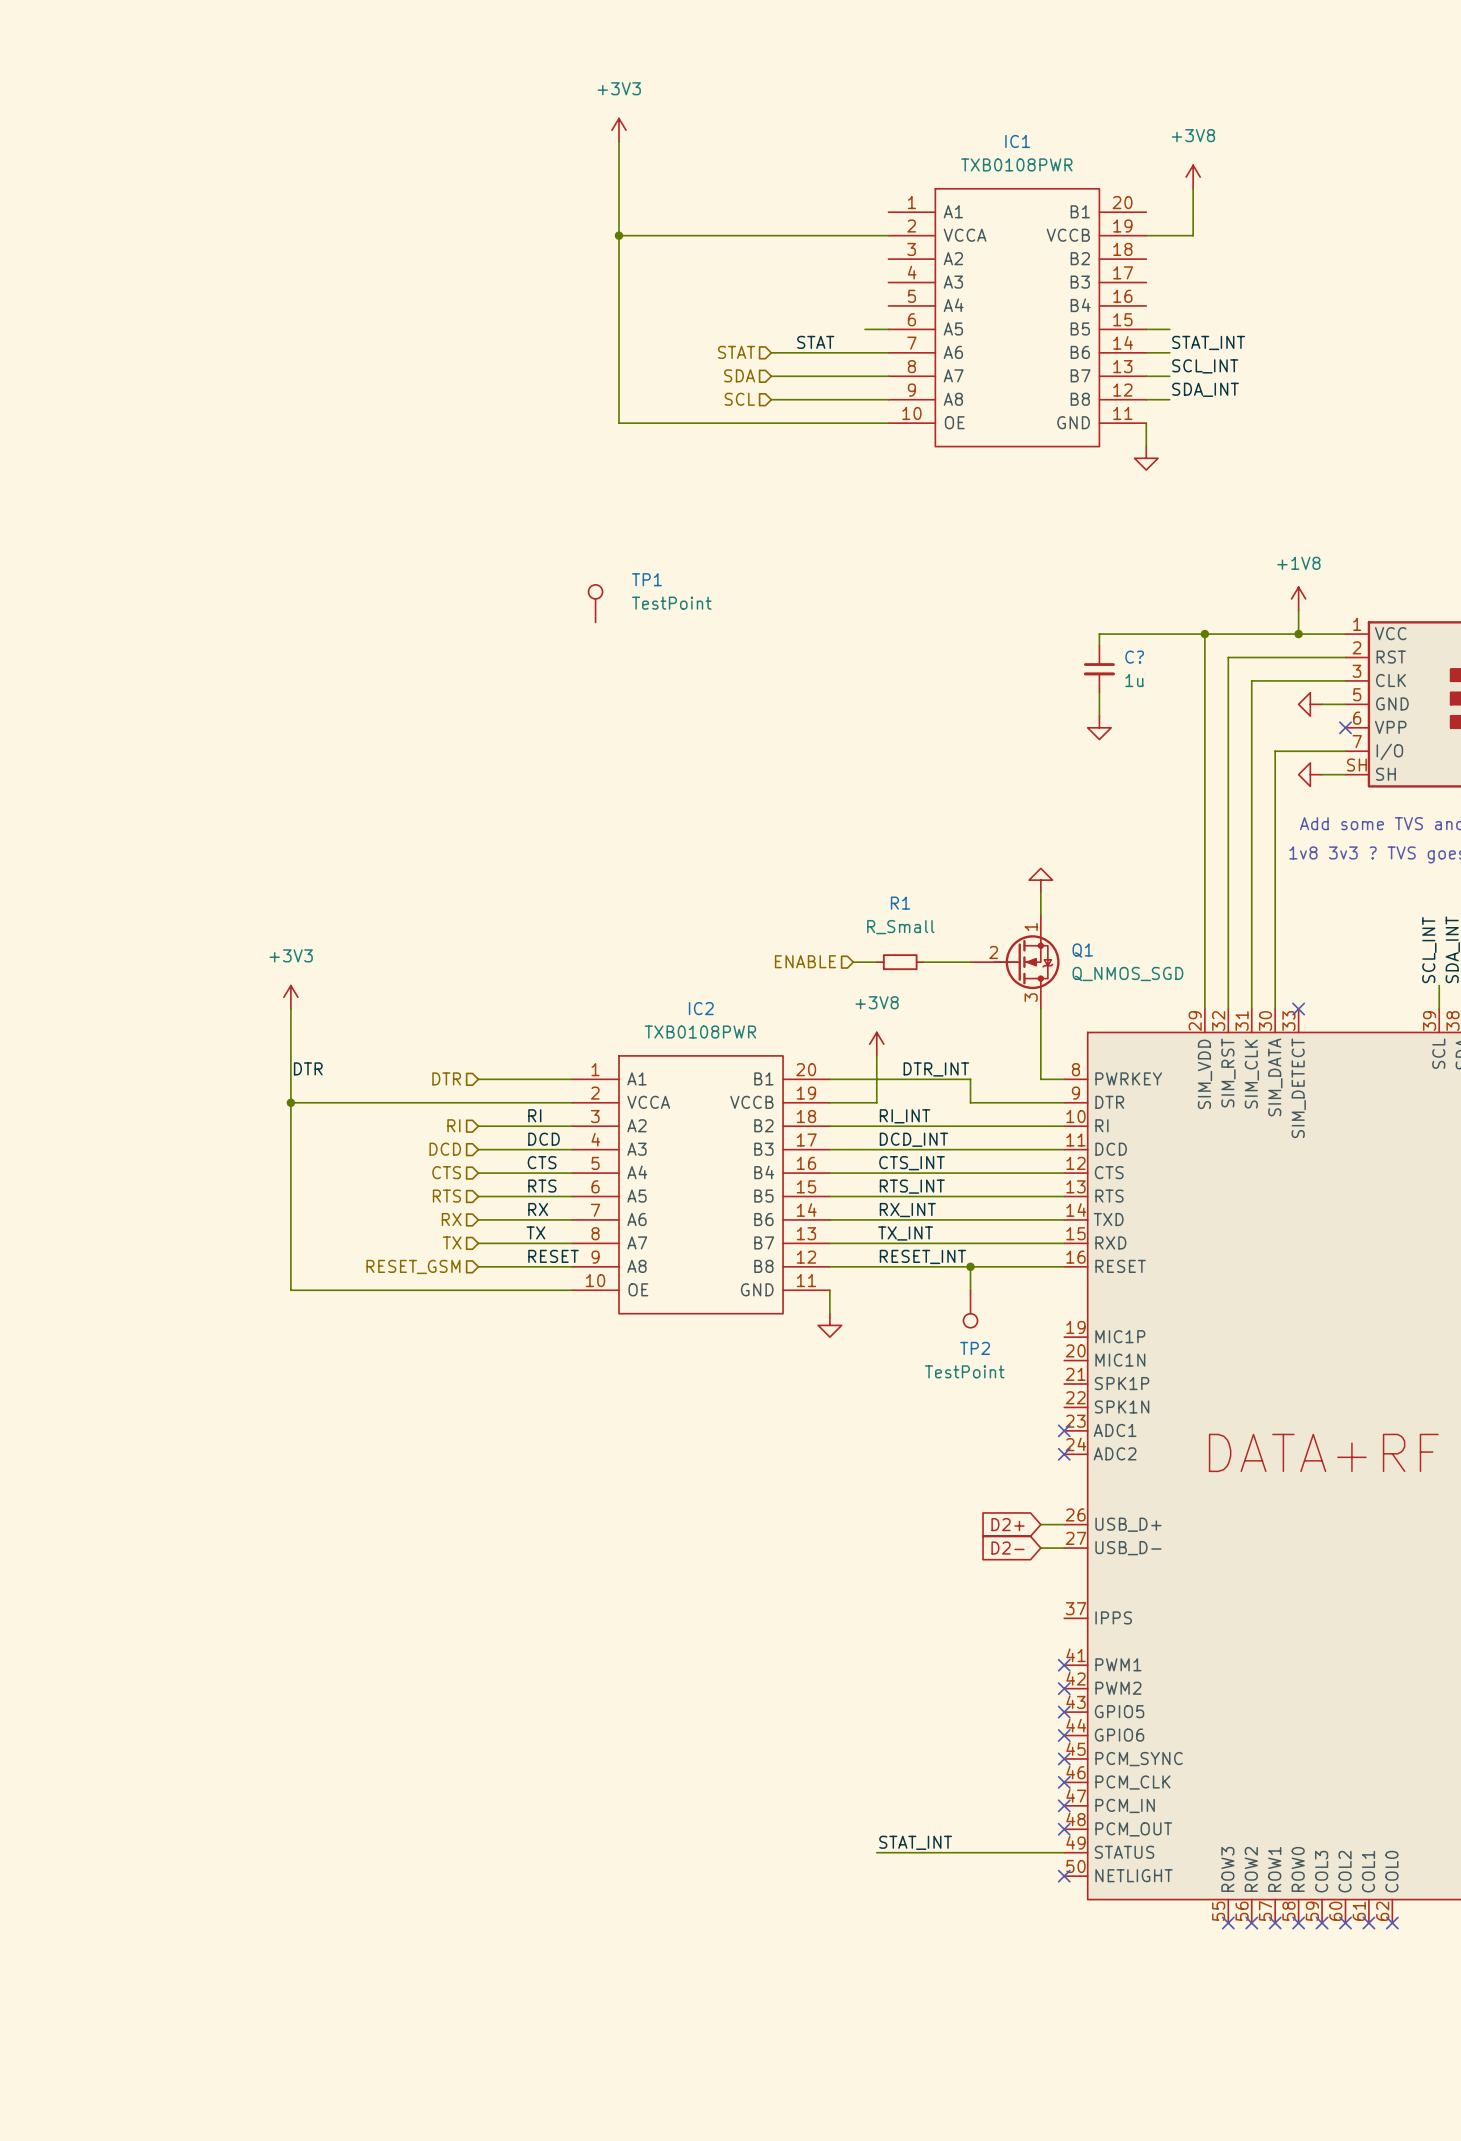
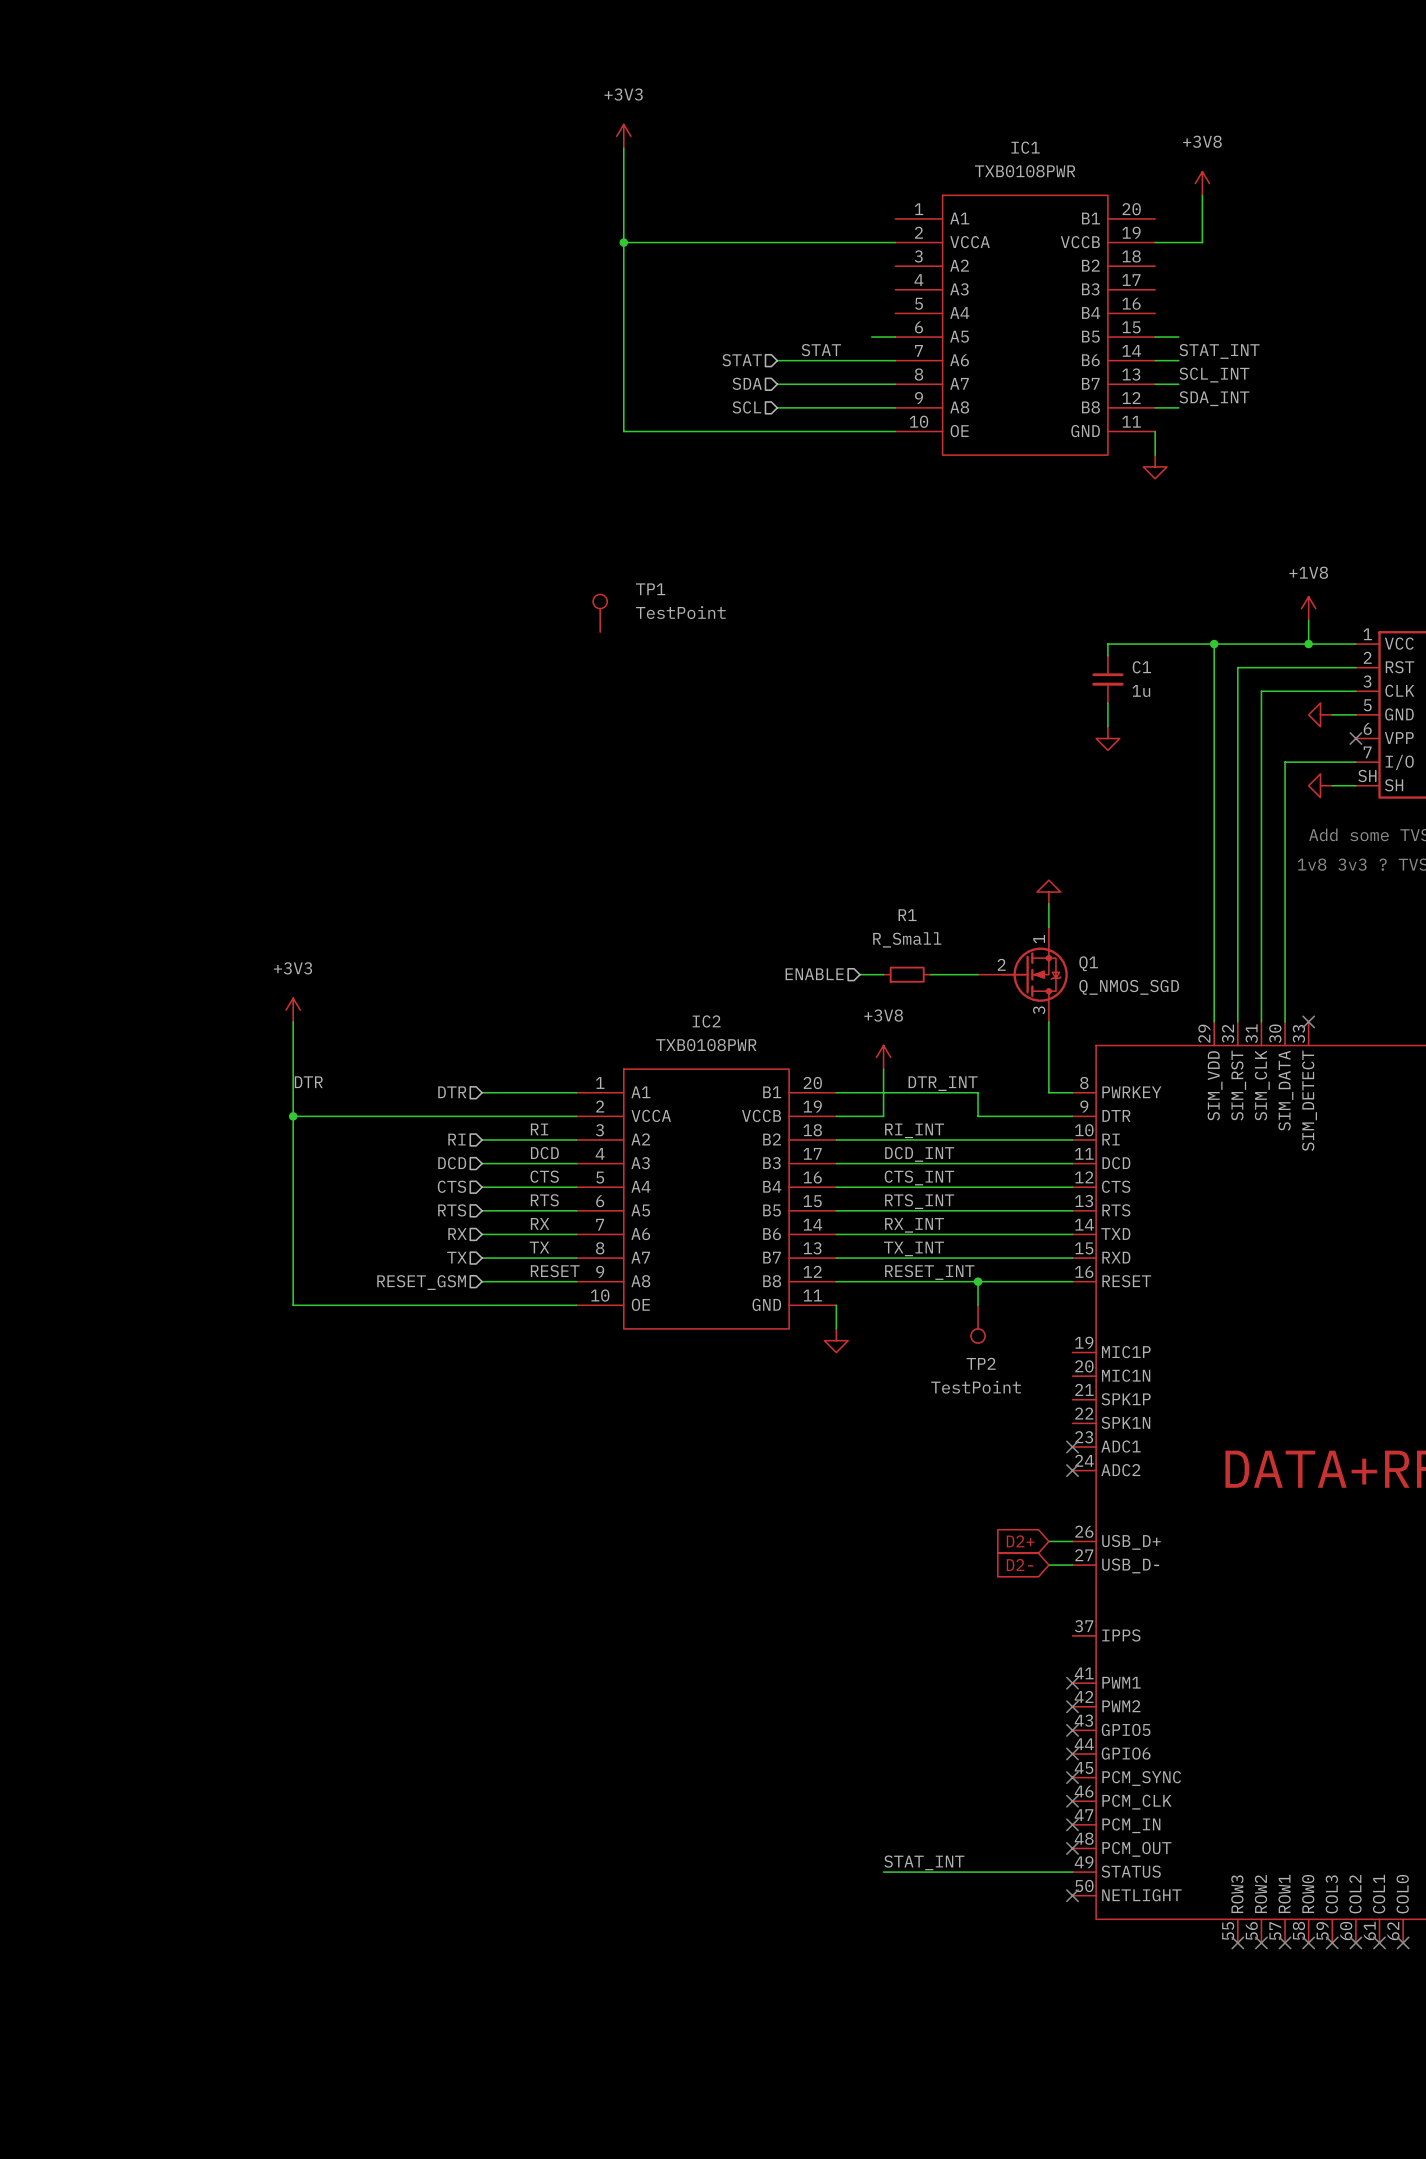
C? name: C? (1134, 657) -> C1 (1141, 667)

